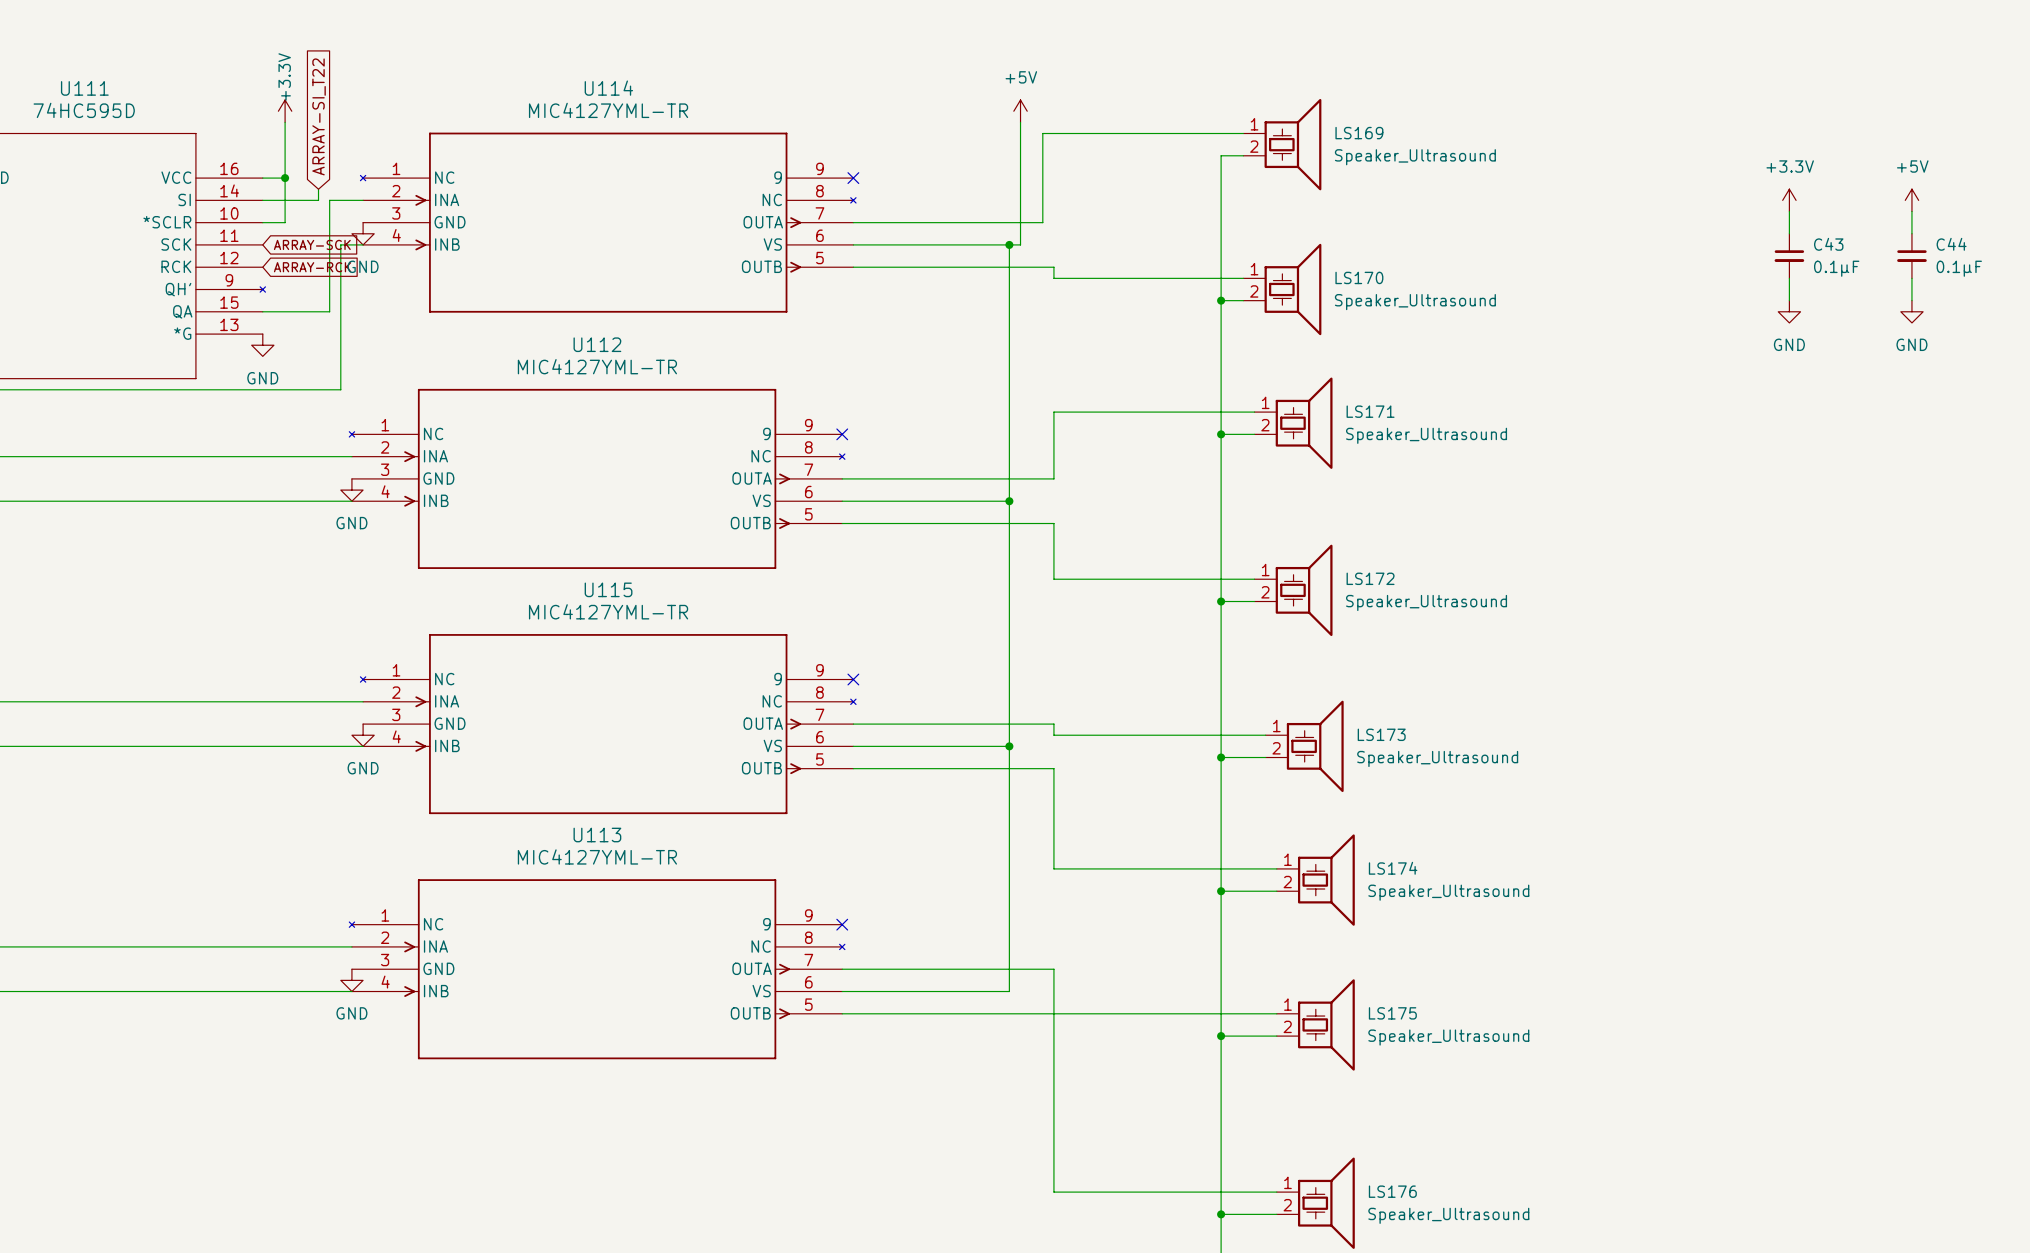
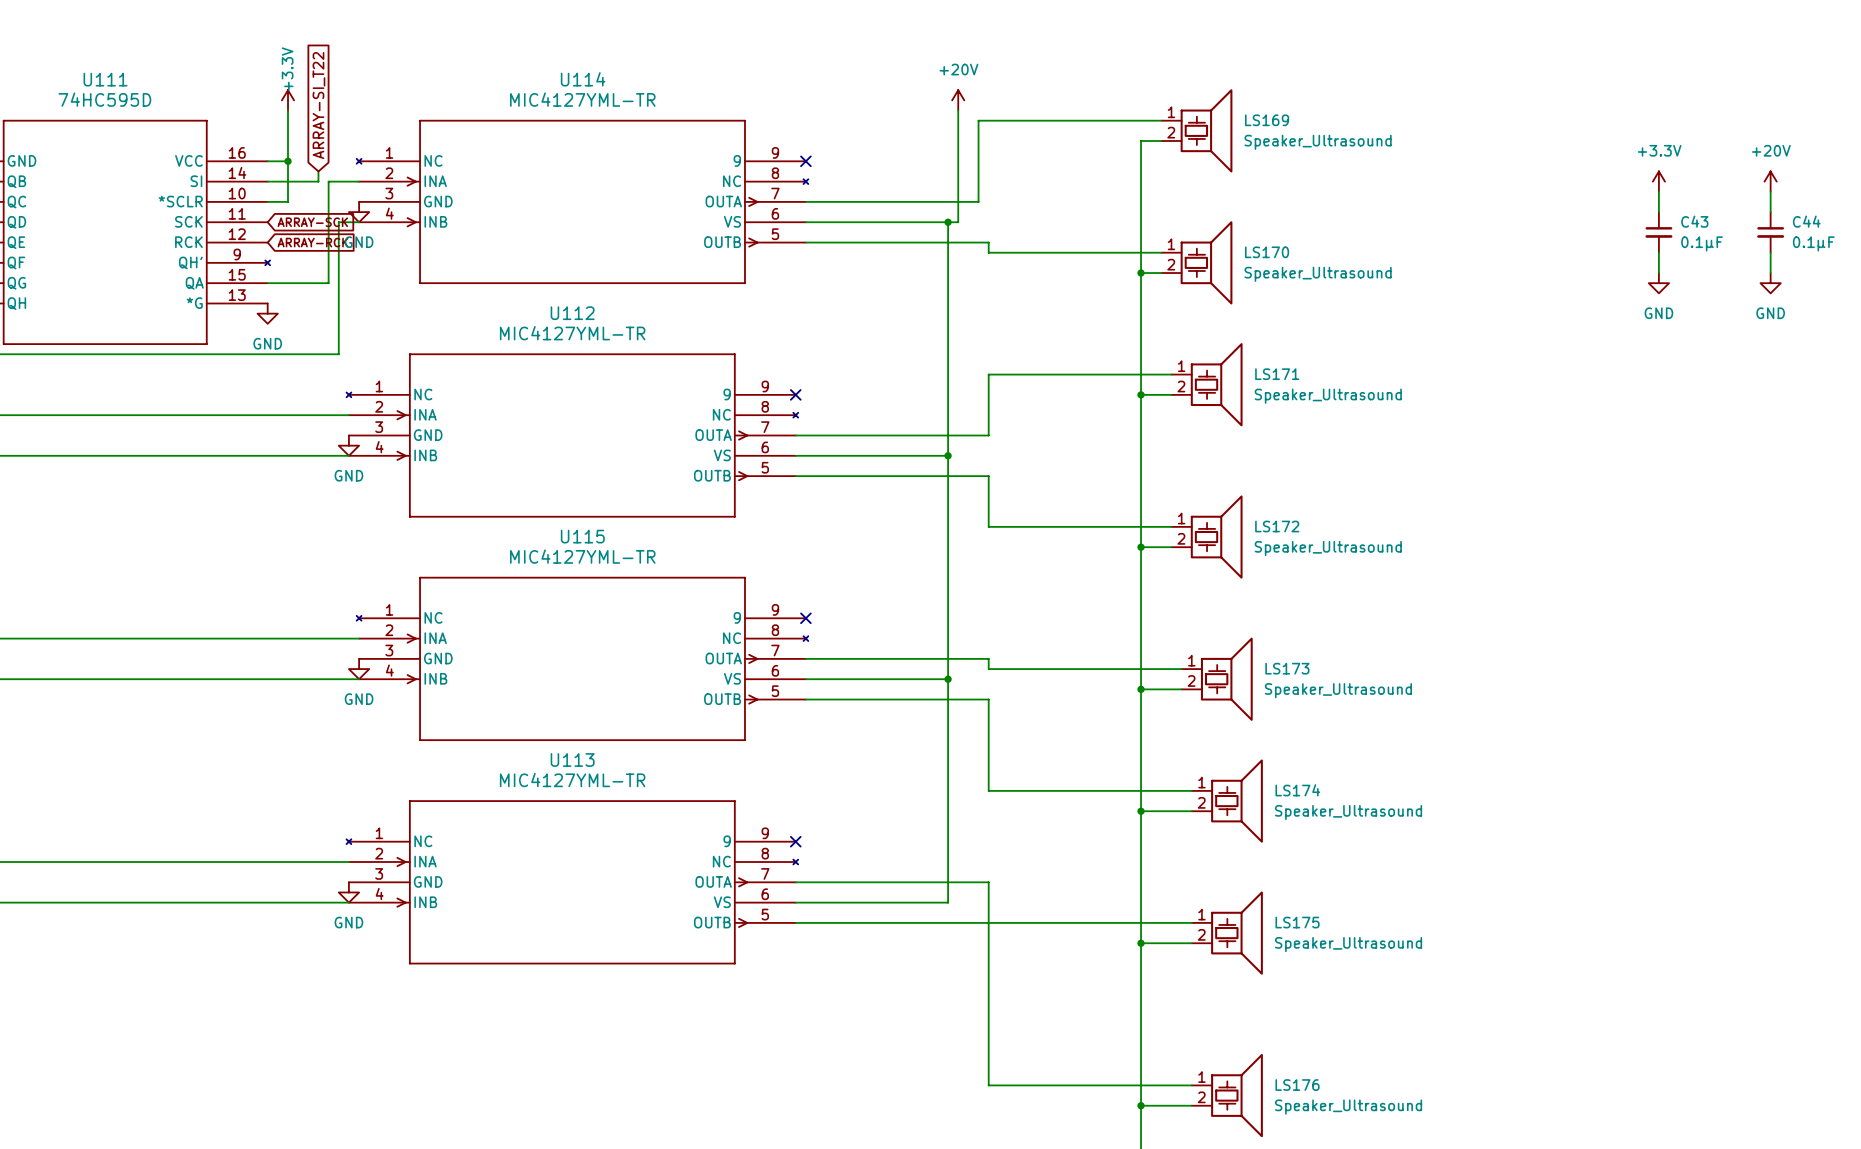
power symbol: +5V (1020, 111) -> +20V (958, 100)
power symbol: +5V (1911, 200) -> +20V (1770, 181)

